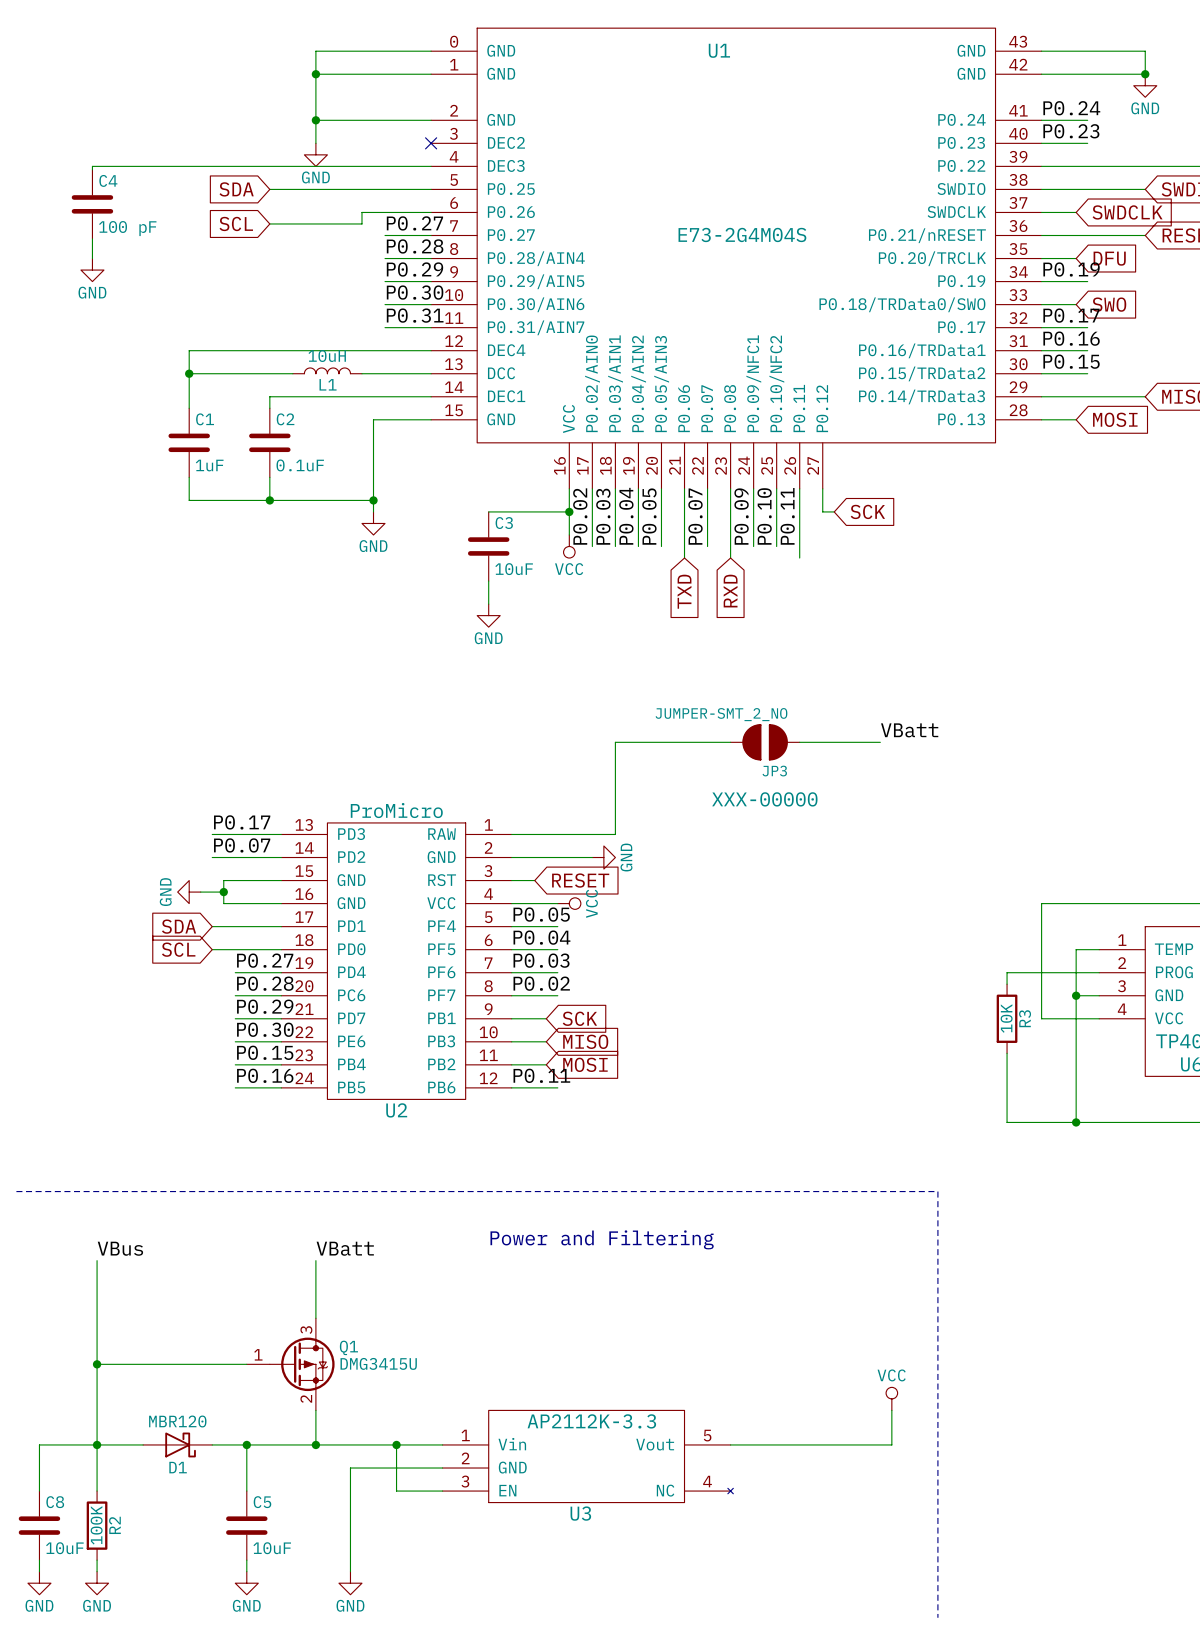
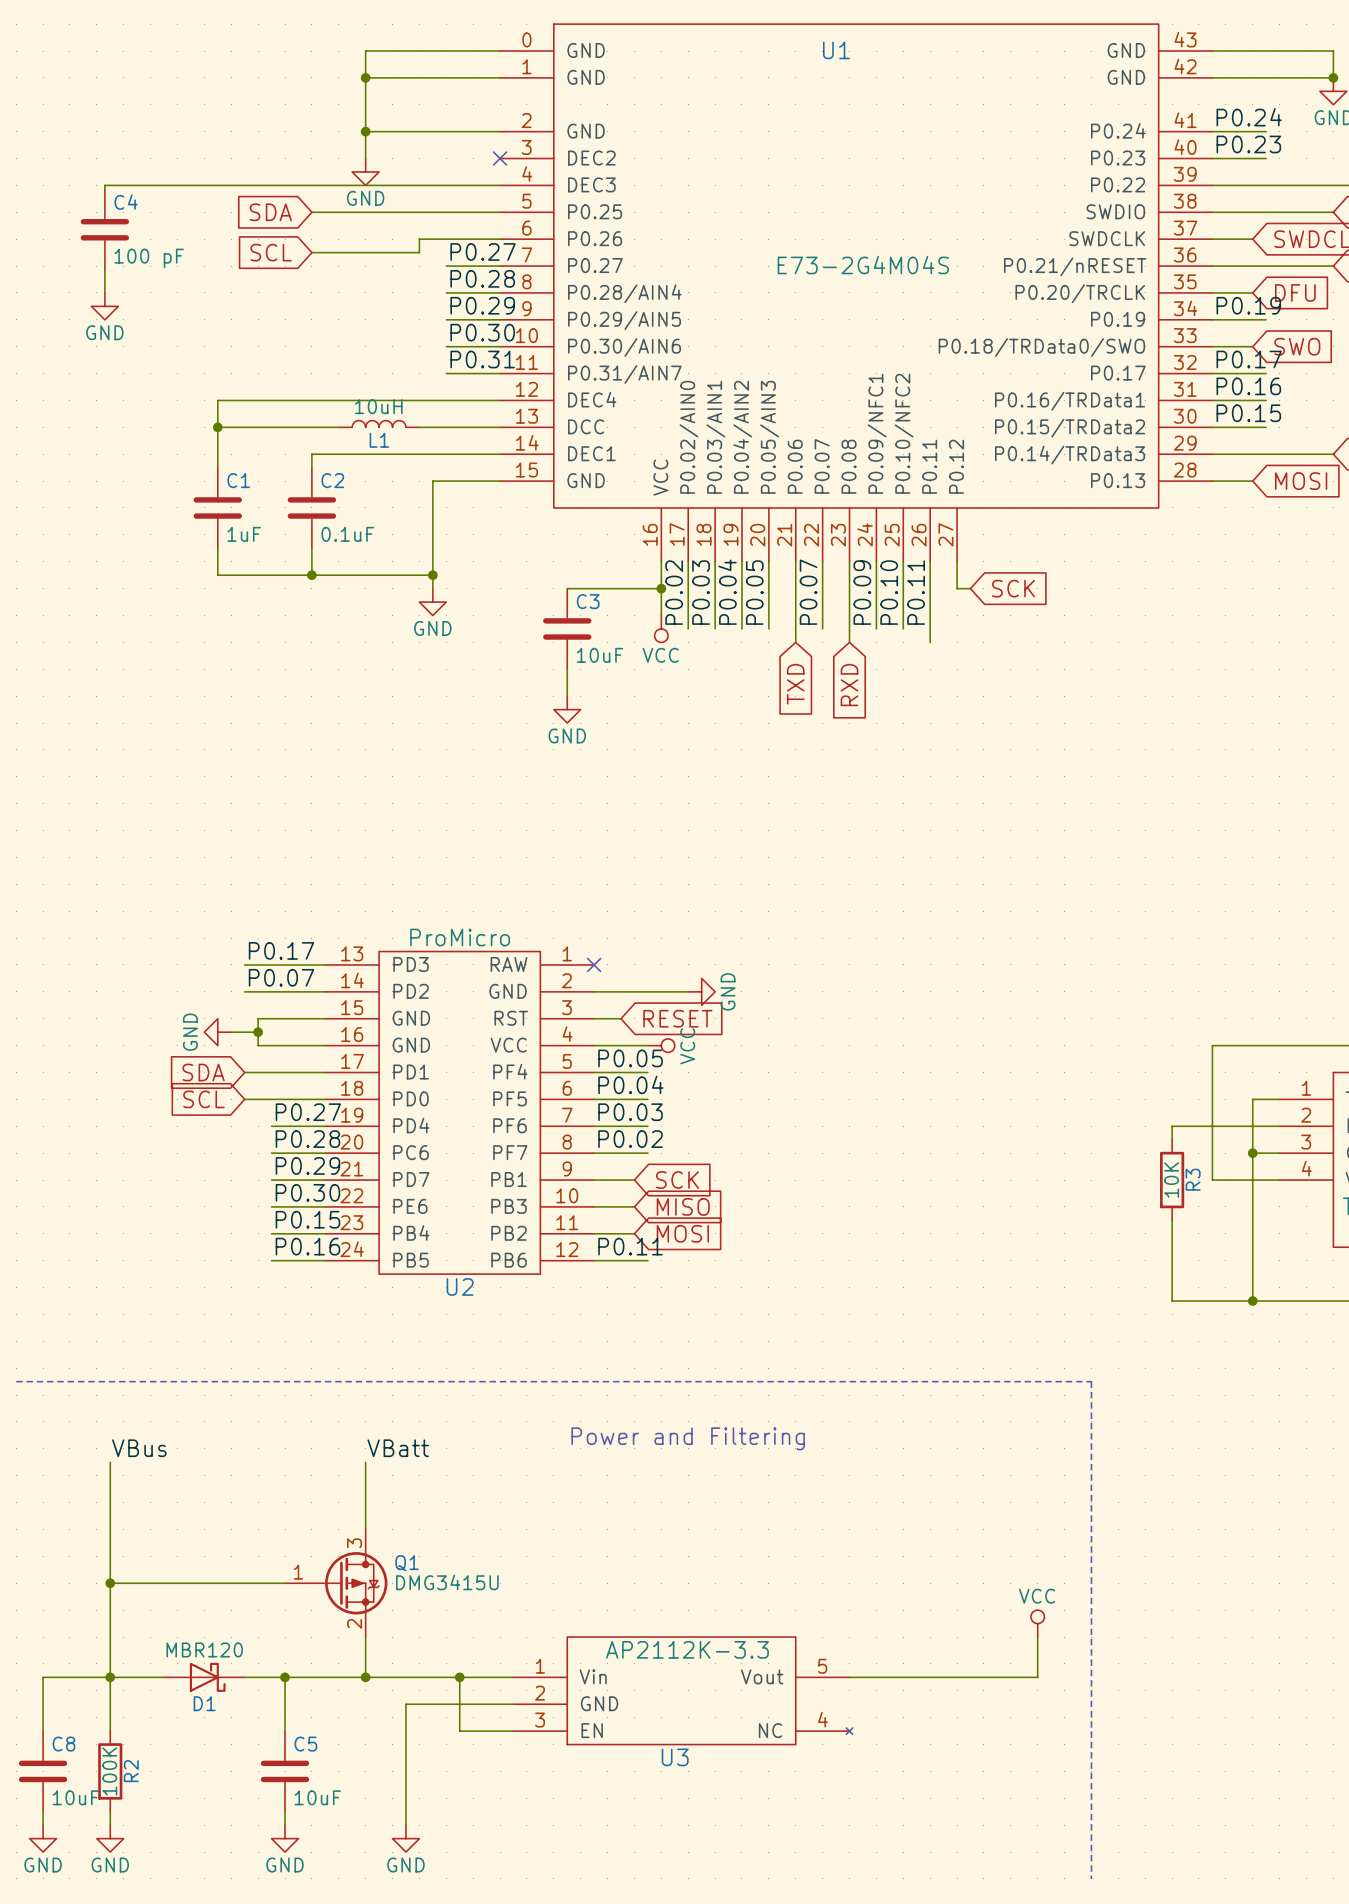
label: VBatt (909, 730) -> none
wire: (730, 742) (615, 742) (615, 834) (511, 834) -> none
JP3: JUMPER-SMT_2_NO (765, 742) -> none
wire: (799, 742) (880, 742) -> none
no-connect mark: none -> (594, 964)

